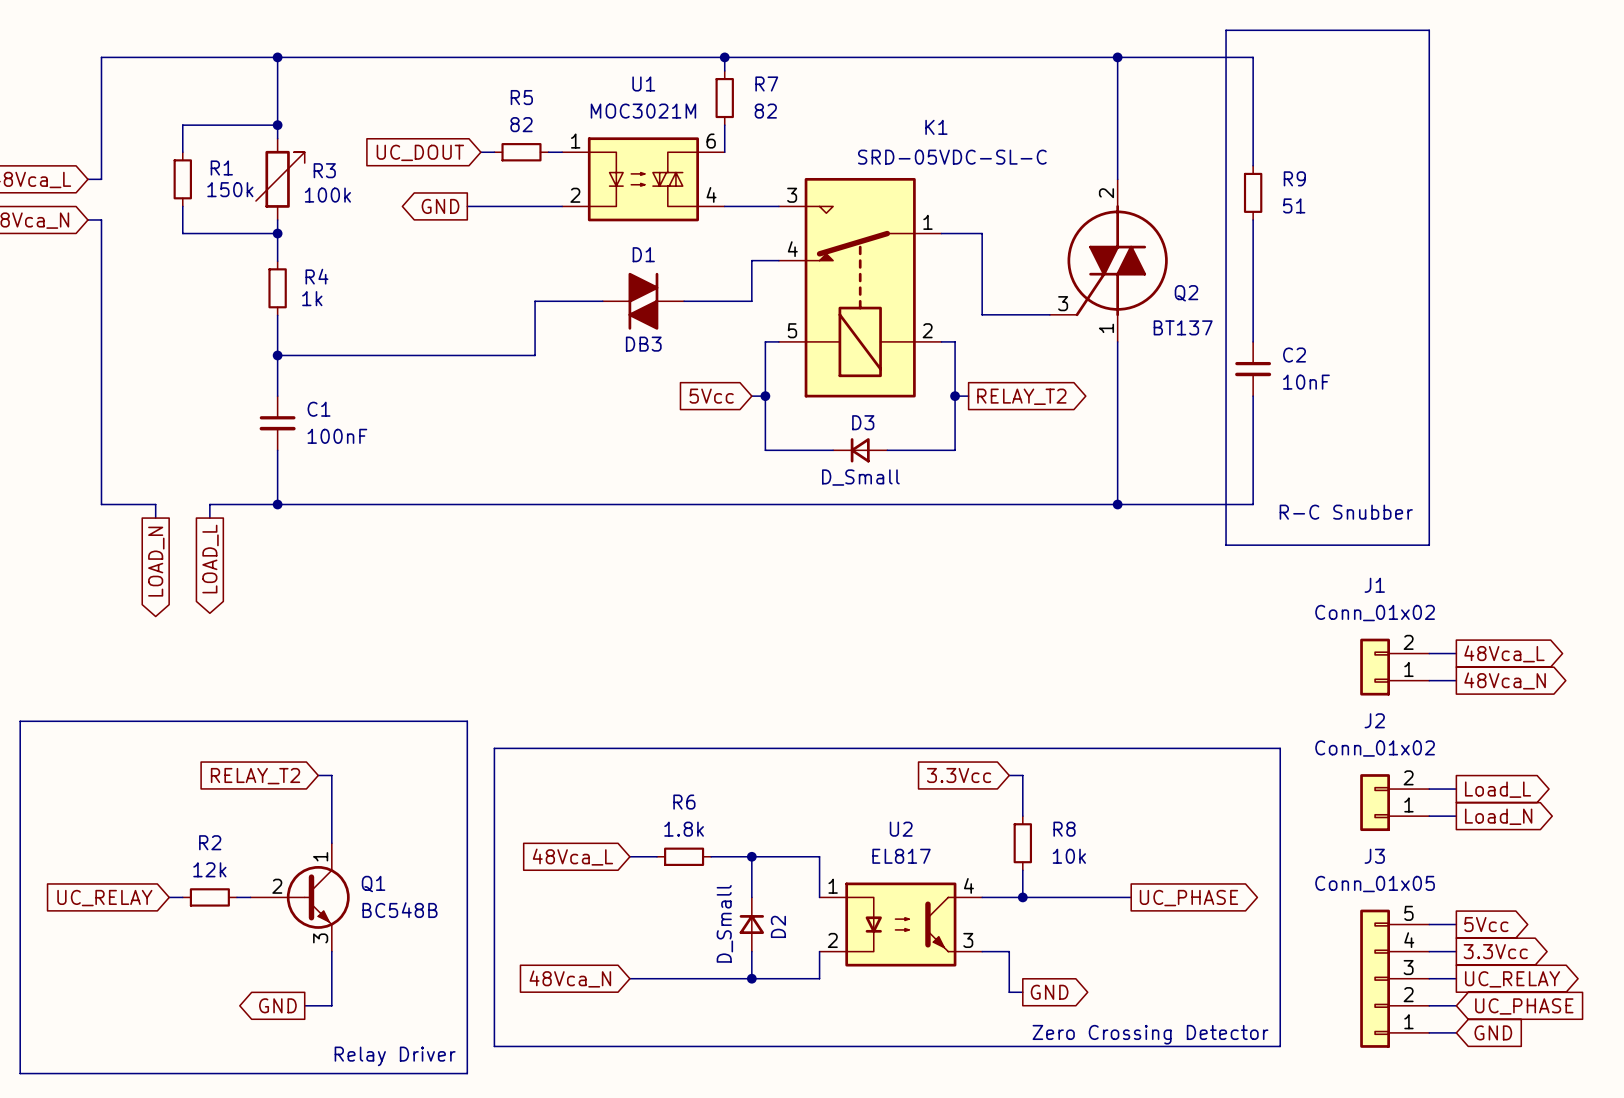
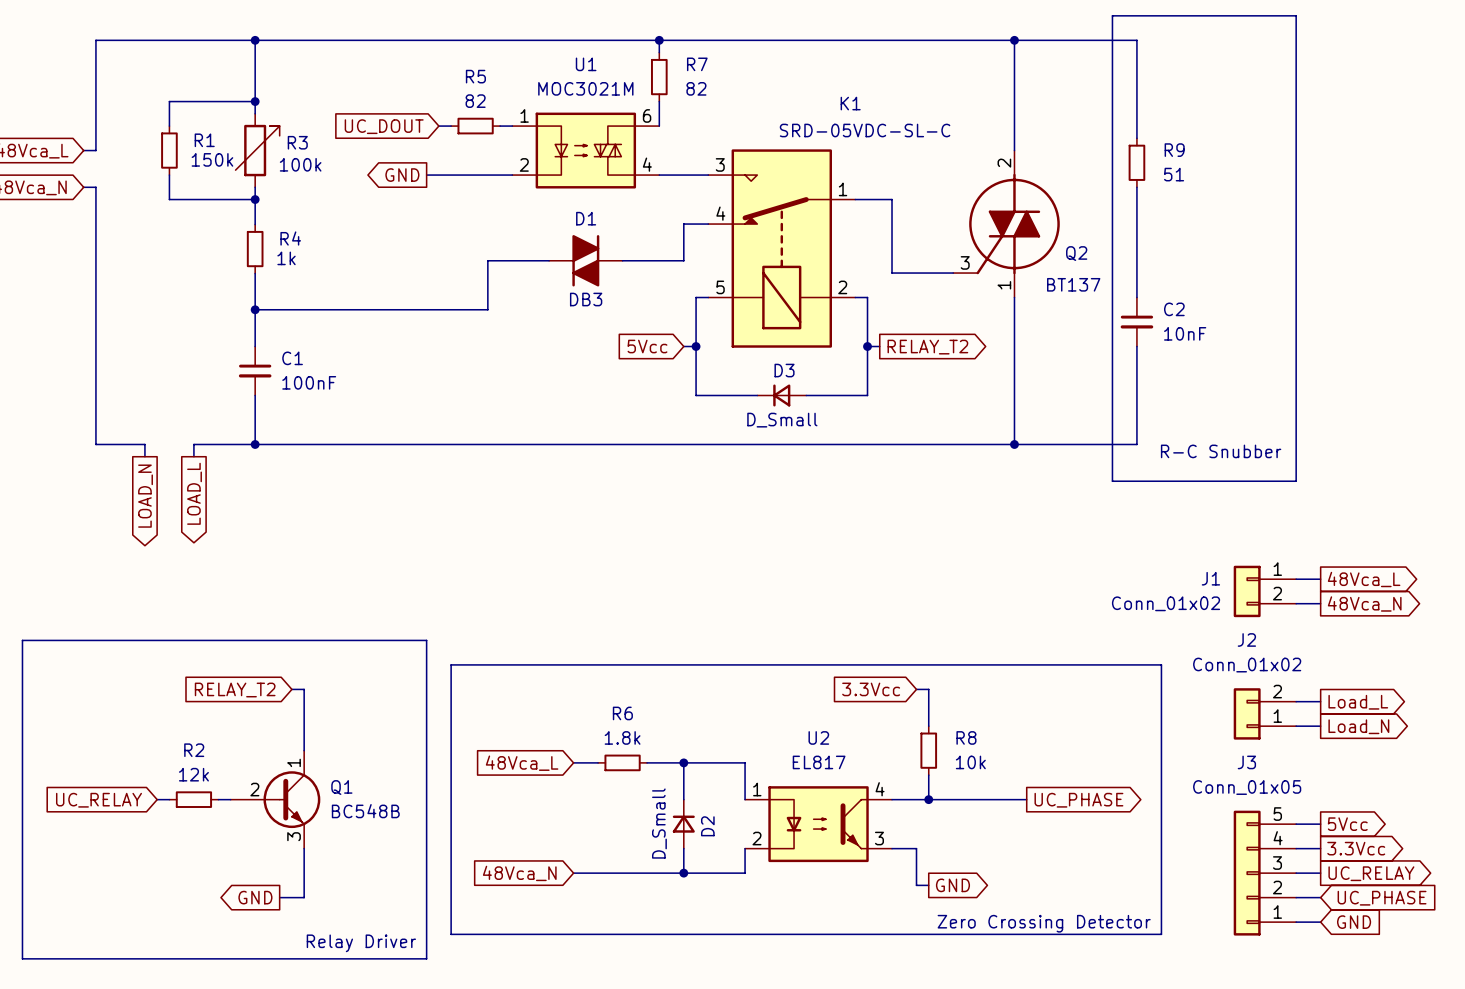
J1 name position: J1 (1374, 585) -> J1 (1210, 578)
J1 value position: Conn_01x02 (1375, 613) -> Conn_01x02 (1166, 603)
J1 flip: as is (1375, 667) -> up-down (1247, 591)

